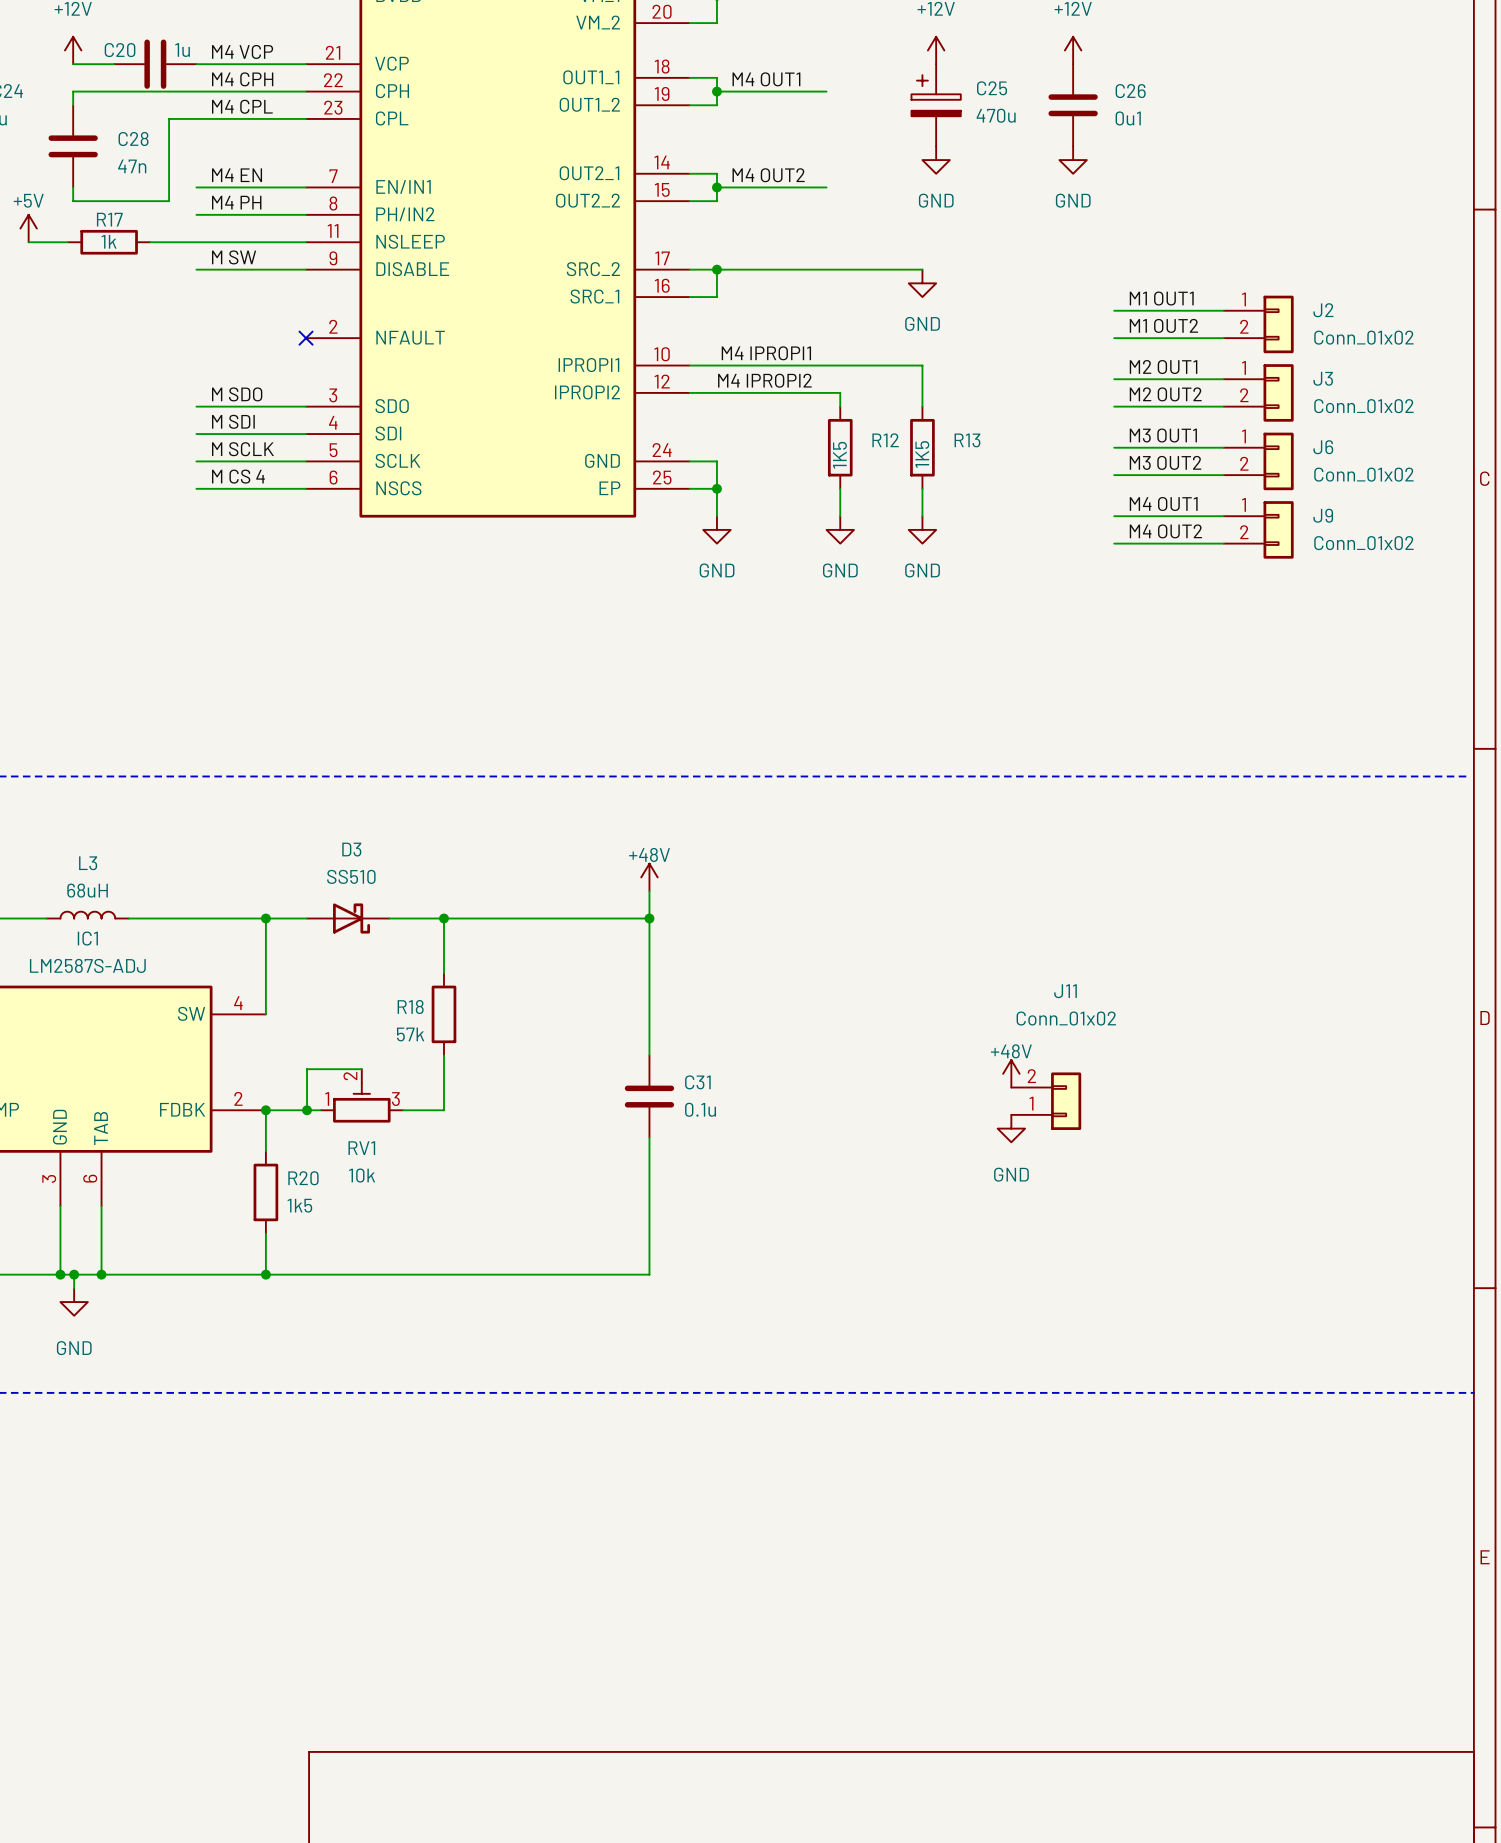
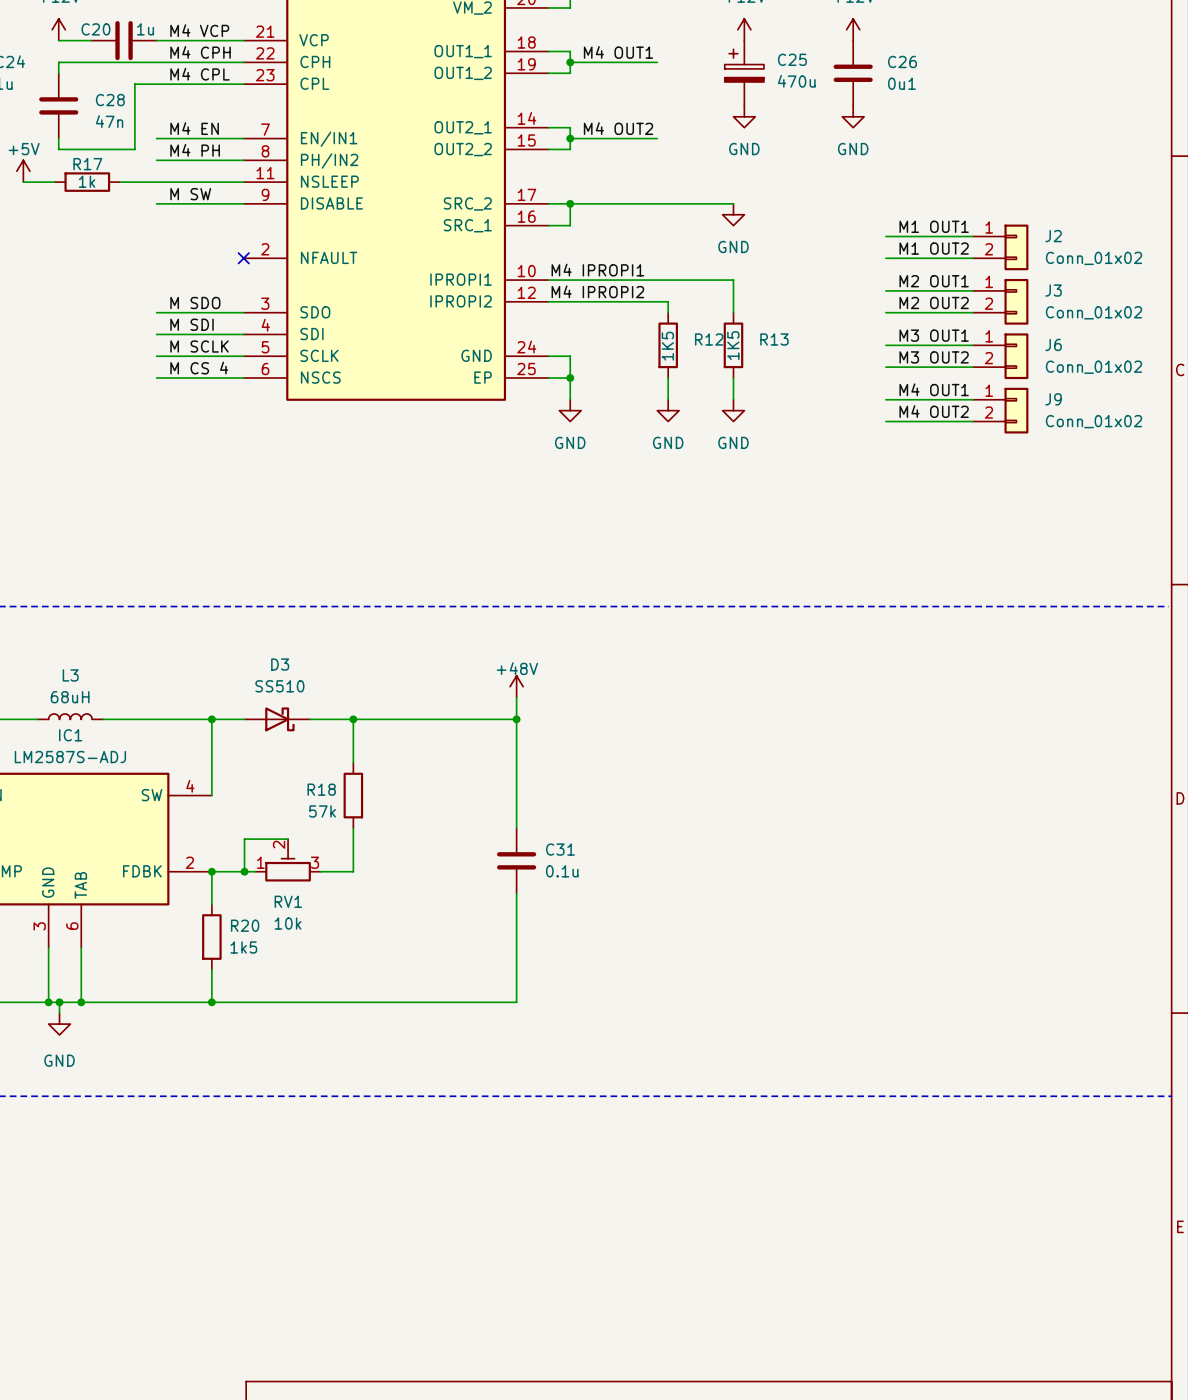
power symbol: +48V (1011, 1073) -> none
J11: Conn_01x02 (1046, 1101) -> none
power symbol: GND (1011, 1128) -> none

